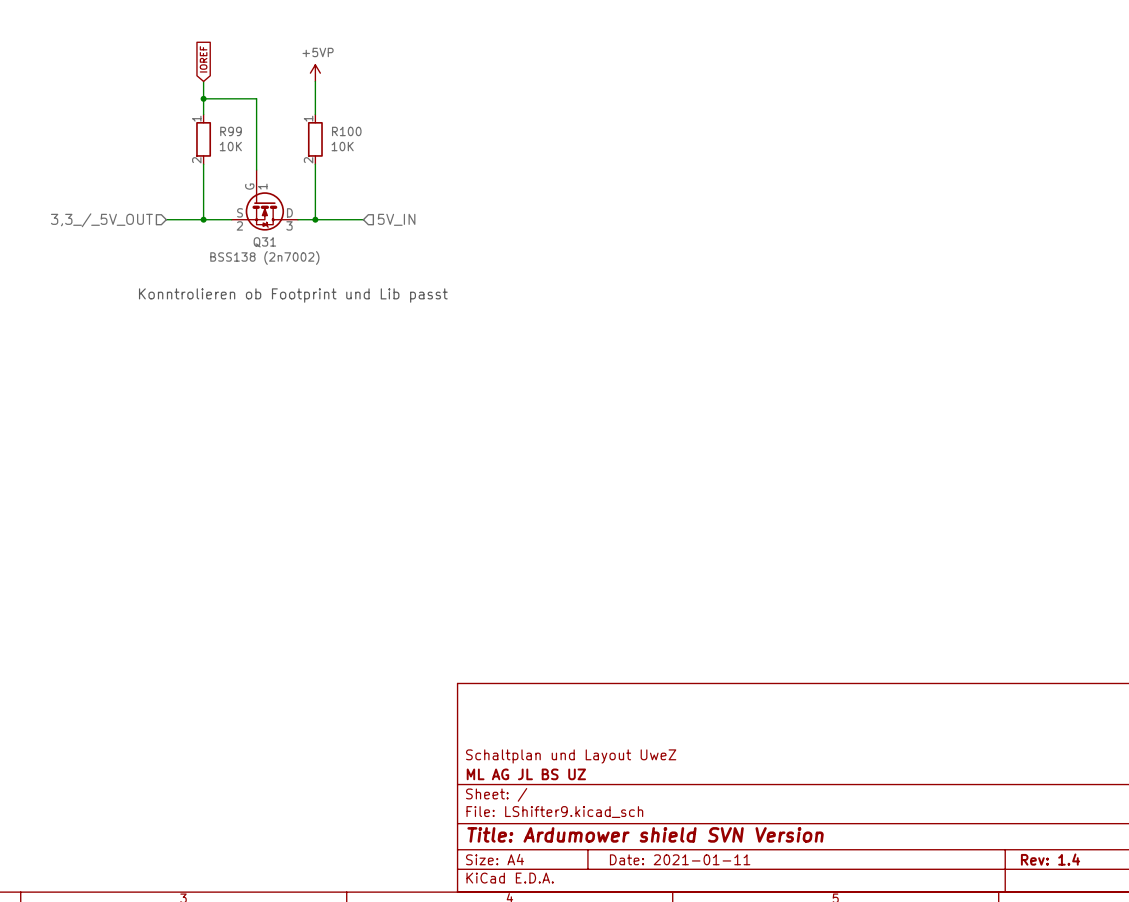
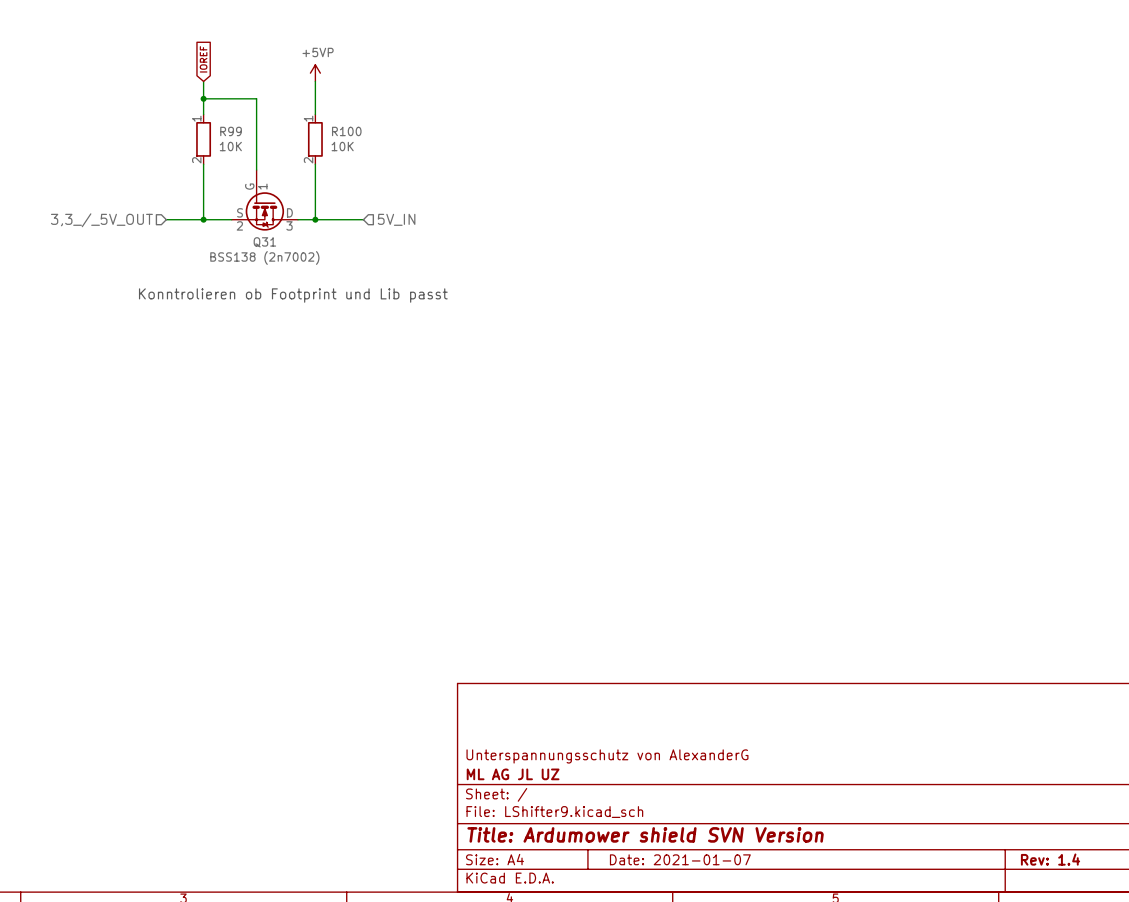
title block: Schaltplan und Layout UweZ (571, 756) -> Unterspannungsschutz von AlexanderG (607, 756)
title block: ML AG JL BS UZ (526, 774) -> ML AG JL UZ (513, 774)
title block: Date: 2021-01-11 (680, 859) -> Date: 2021-01-07 (680, 859)

